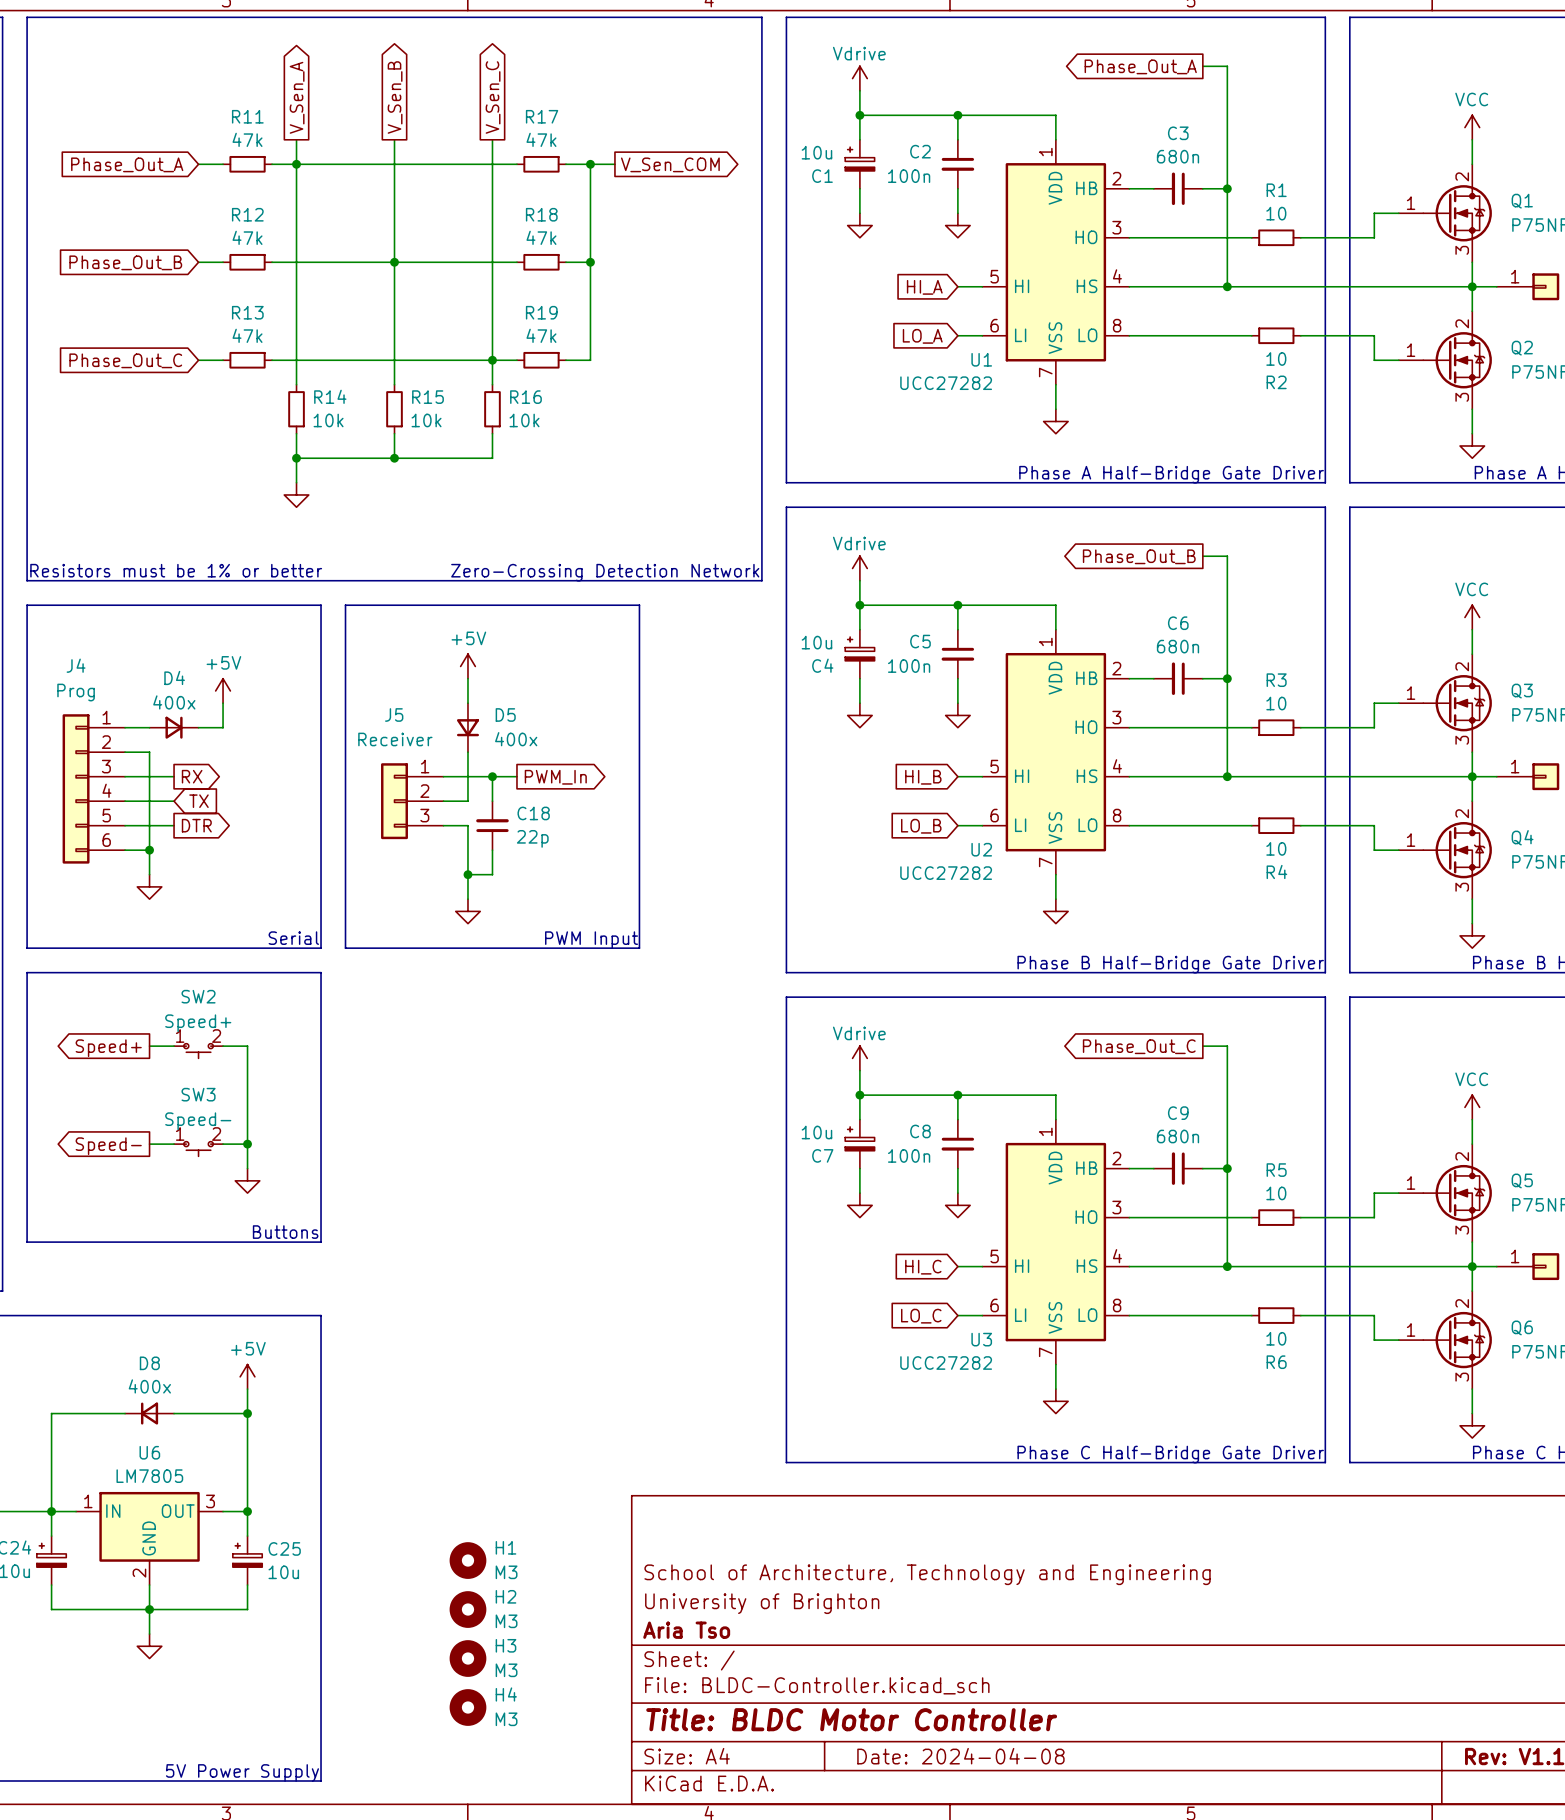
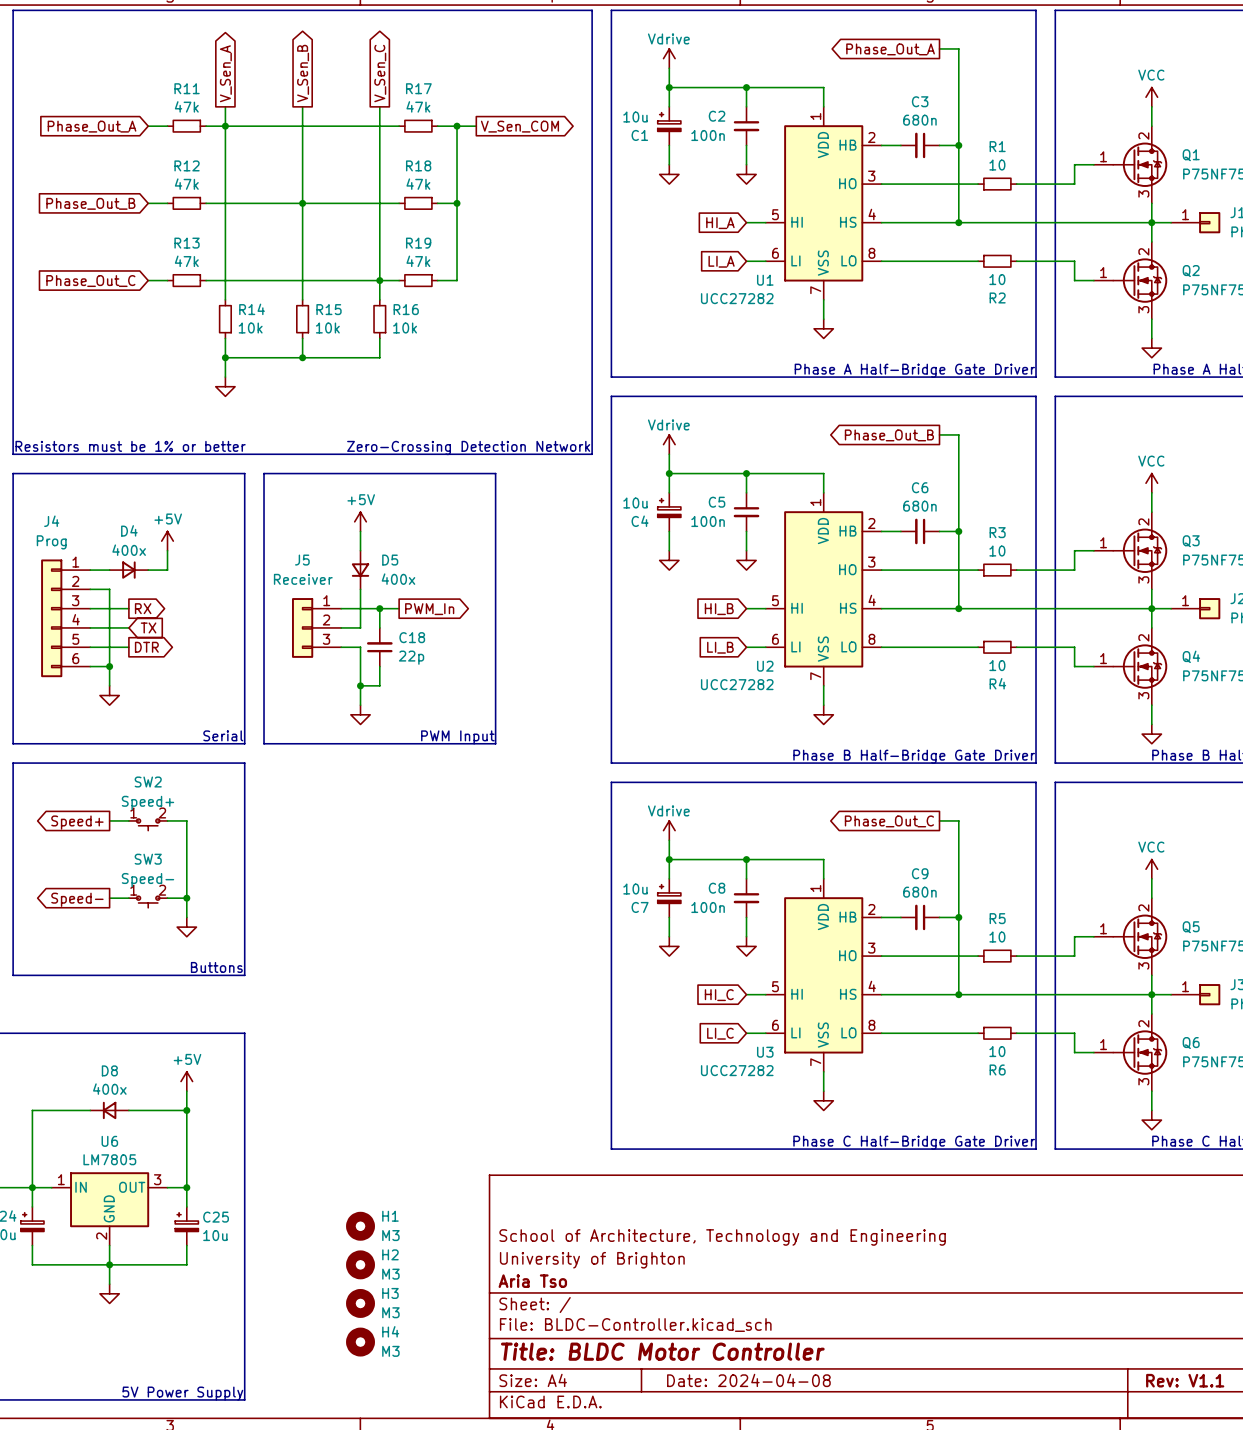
global label: LO_A (922, 336) -> LI_A (721, 261)
global label: LO_B (921, 826) -> LI_B (720, 647)
global label: LO_C (921, 1316) -> LI_C (720, 1033)

